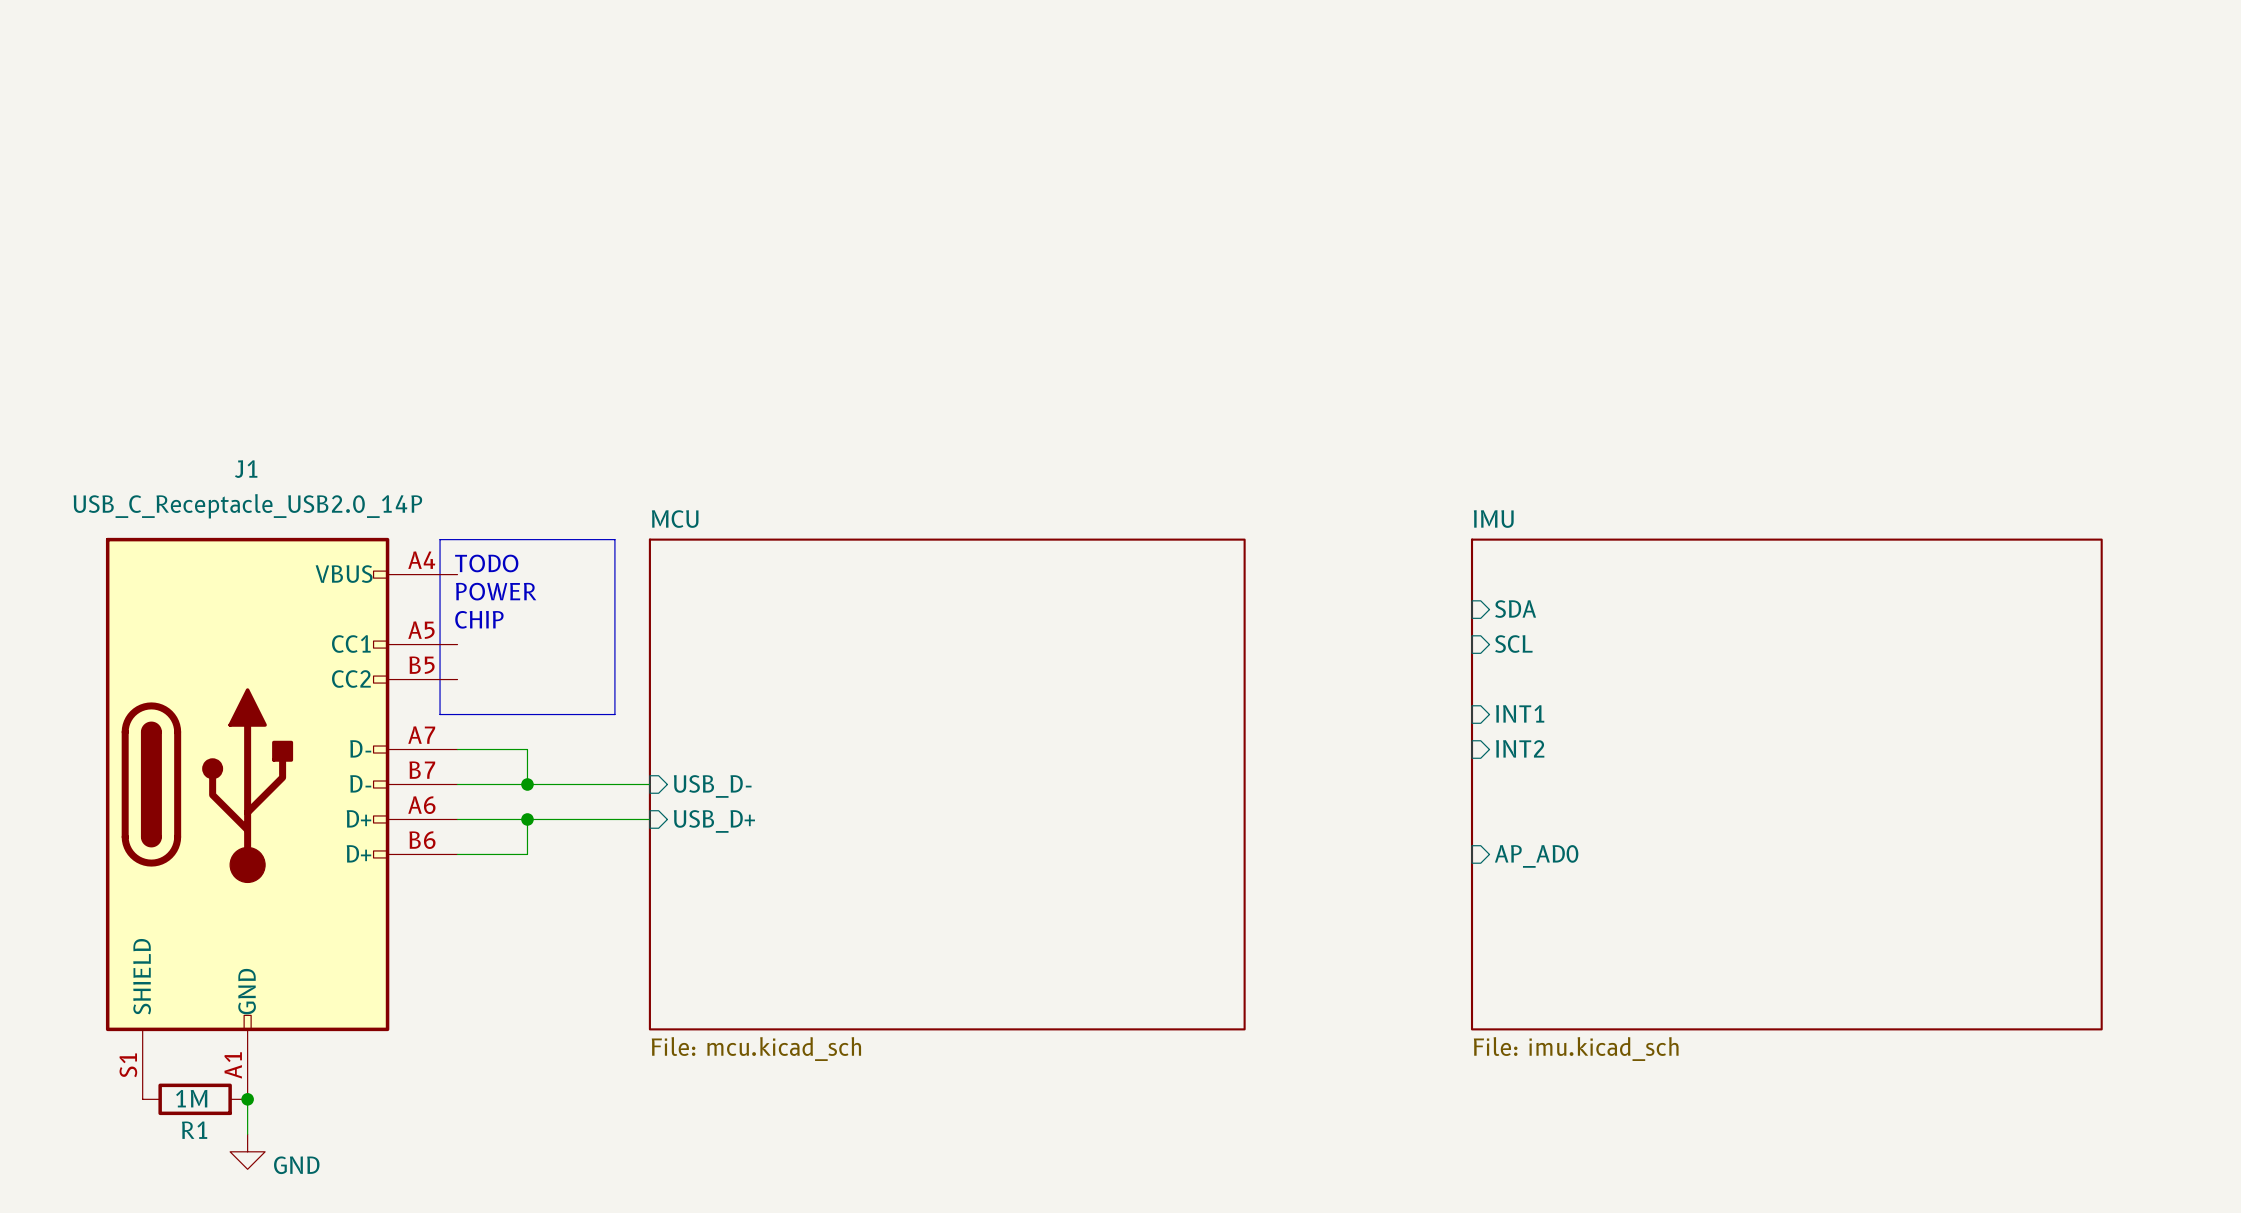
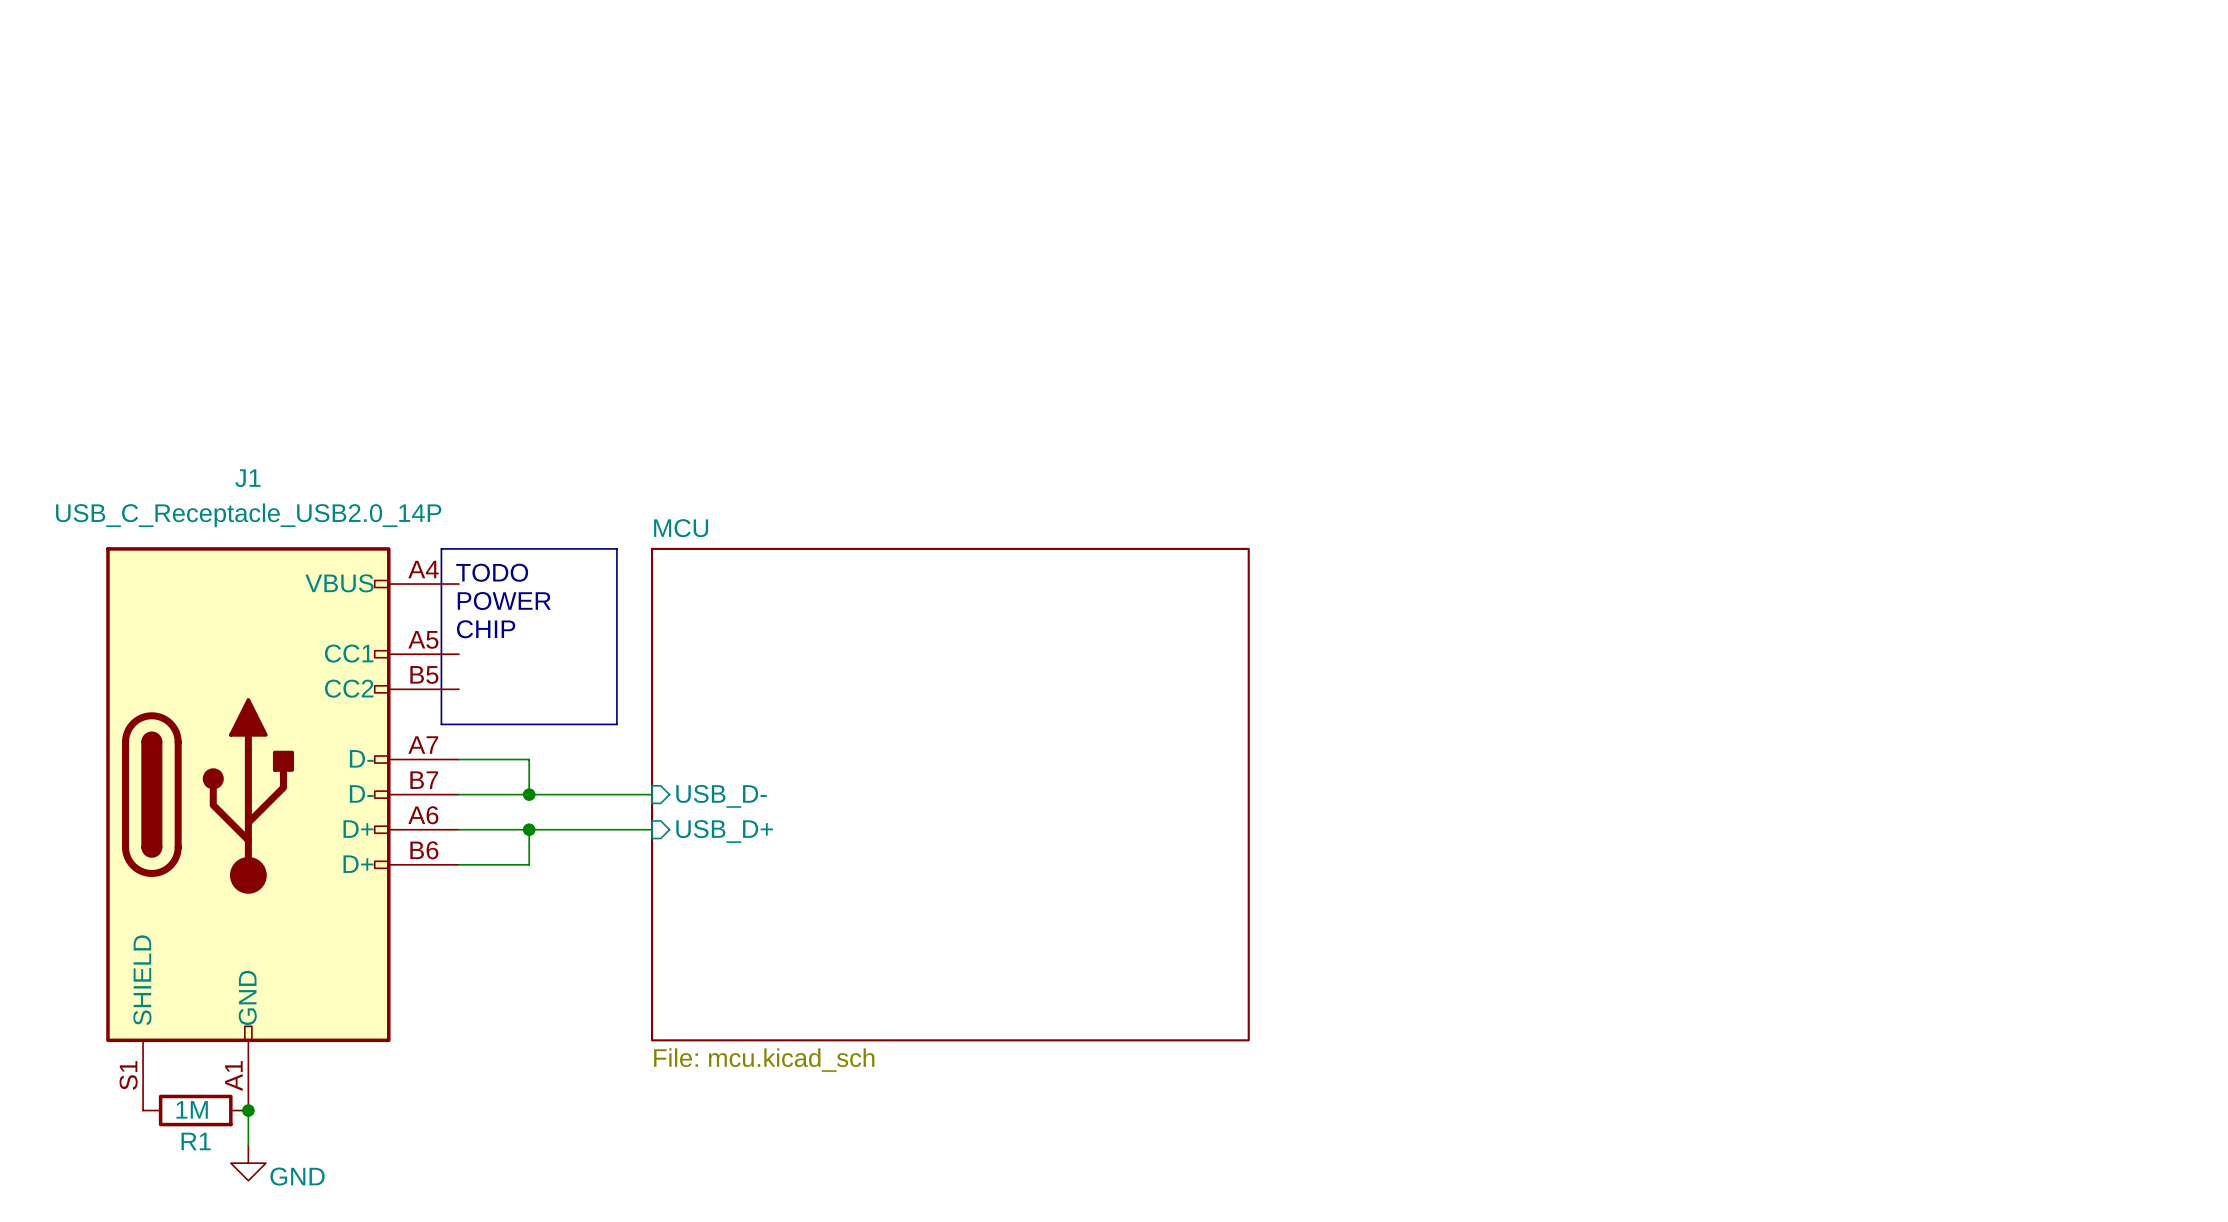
sheet pin: SDA (1515, 609) -> none
sheet pin: SCL (1513, 644) -> none
sheet pin: INT1 (1520, 713) -> none
sheet pin: INT2 (1520, 748) -> none
sheet IMU: File: imu.kicad_sch (1786, 784) -> none
sheet pin: AP_AD0 (1536, 856) -> none

